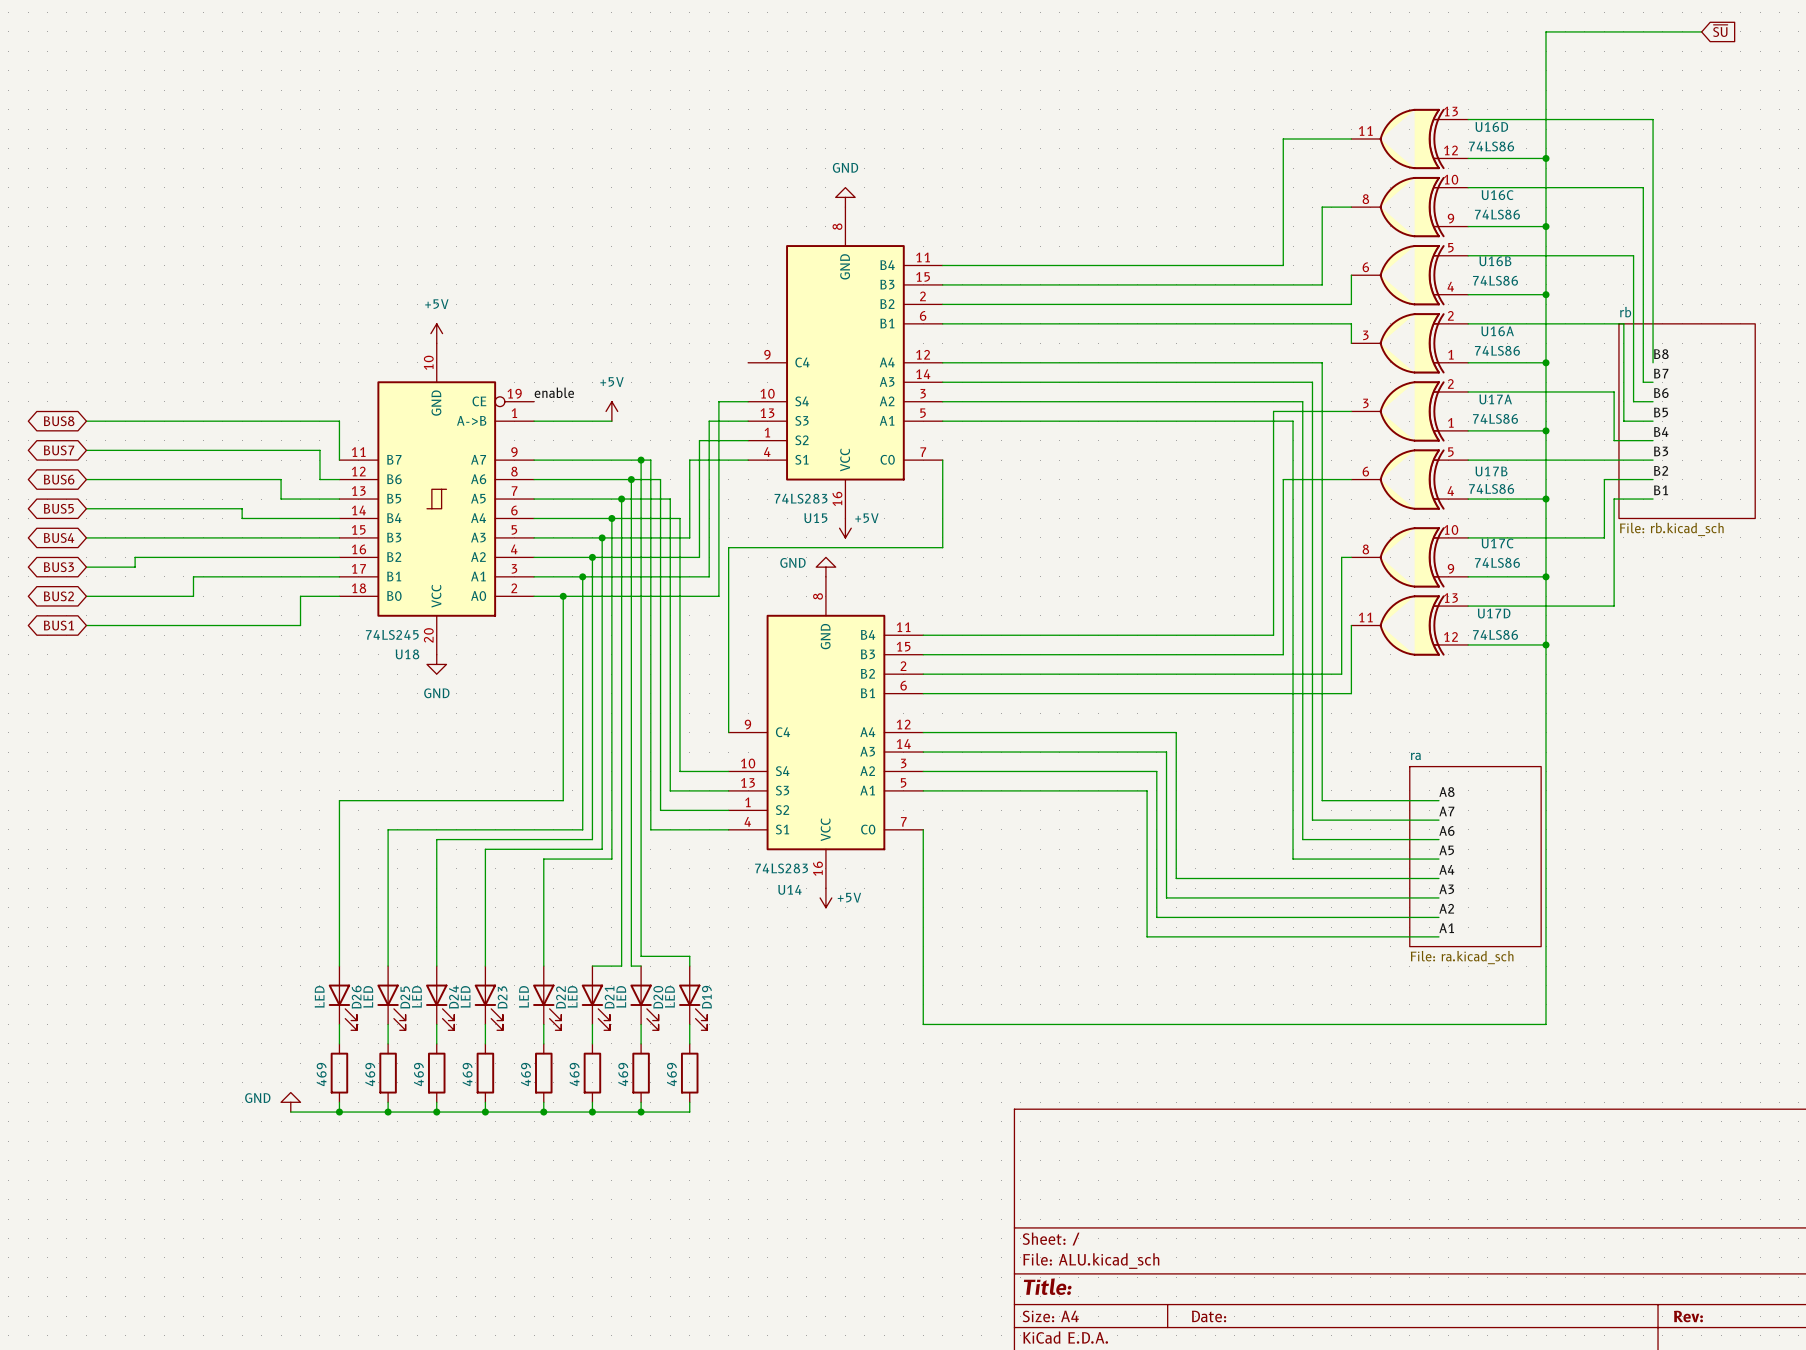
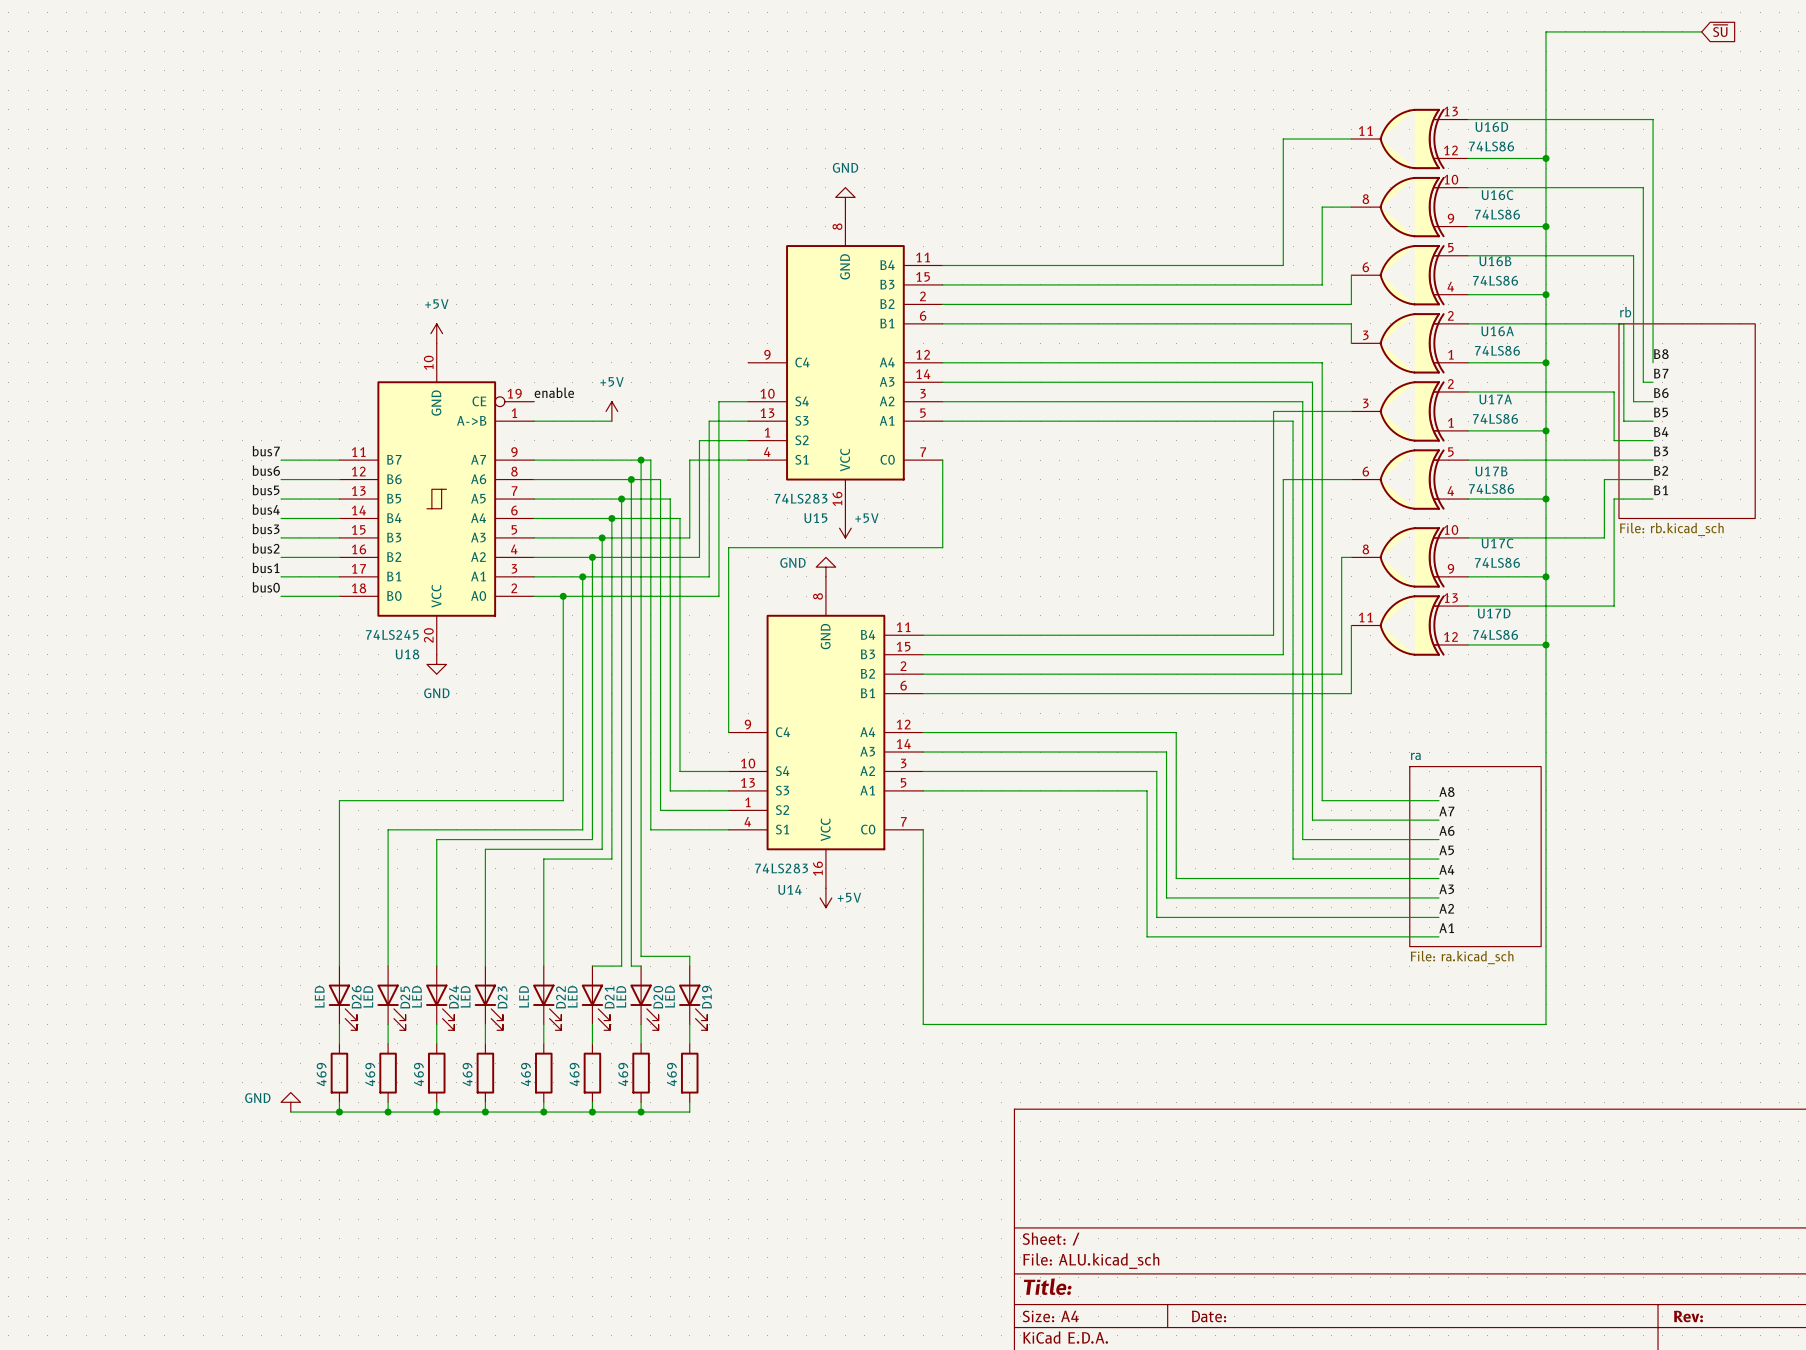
global label: BUS8 (59, 421) -> none
wire: (86, 421) (339, 421) (339, 460) -> (281, 460) (339, 460)
global label: BUS7 (59, 450) -> none
wire: (86, 450) (319, 450) (319, 479) -> (281, 479) (319, 479)
label: none -> bus7 (266, 451)
label: none -> bus6 (266, 470)
global label: BUS6 (59, 479) -> none
wire: (86, 479) (281, 479) (281, 499) -> none
label: none -> bus5 (266, 490)
global label: BUS5 (58, 508) -> none
wire: (86, 508) (242, 508) (242, 518) (281, 518) -> none
label: none -> bus4 (266, 509)
label: none -> bus3 (266, 528)
global label: BUS4 (59, 537) -> none
wire: (86, 537) (281, 537) -> none
label: none -> bus2 (266, 548)
wire: (281, 557) (135, 557) (135, 567) (86, 567) -> none
global label: BUS3 (58, 567) -> none
label: none -> bus1 (266, 567)
wire: (281, 576) (193, 576) (193, 596) (86, 596) -> none
label: none -> bus0 (266, 587)
global label: BUS2 (58, 596) -> none
wire: (300, 596) (300, 625) (86, 625) -> (300, 596) (281, 596)
global label: BUS1 (58, 625) -> none

